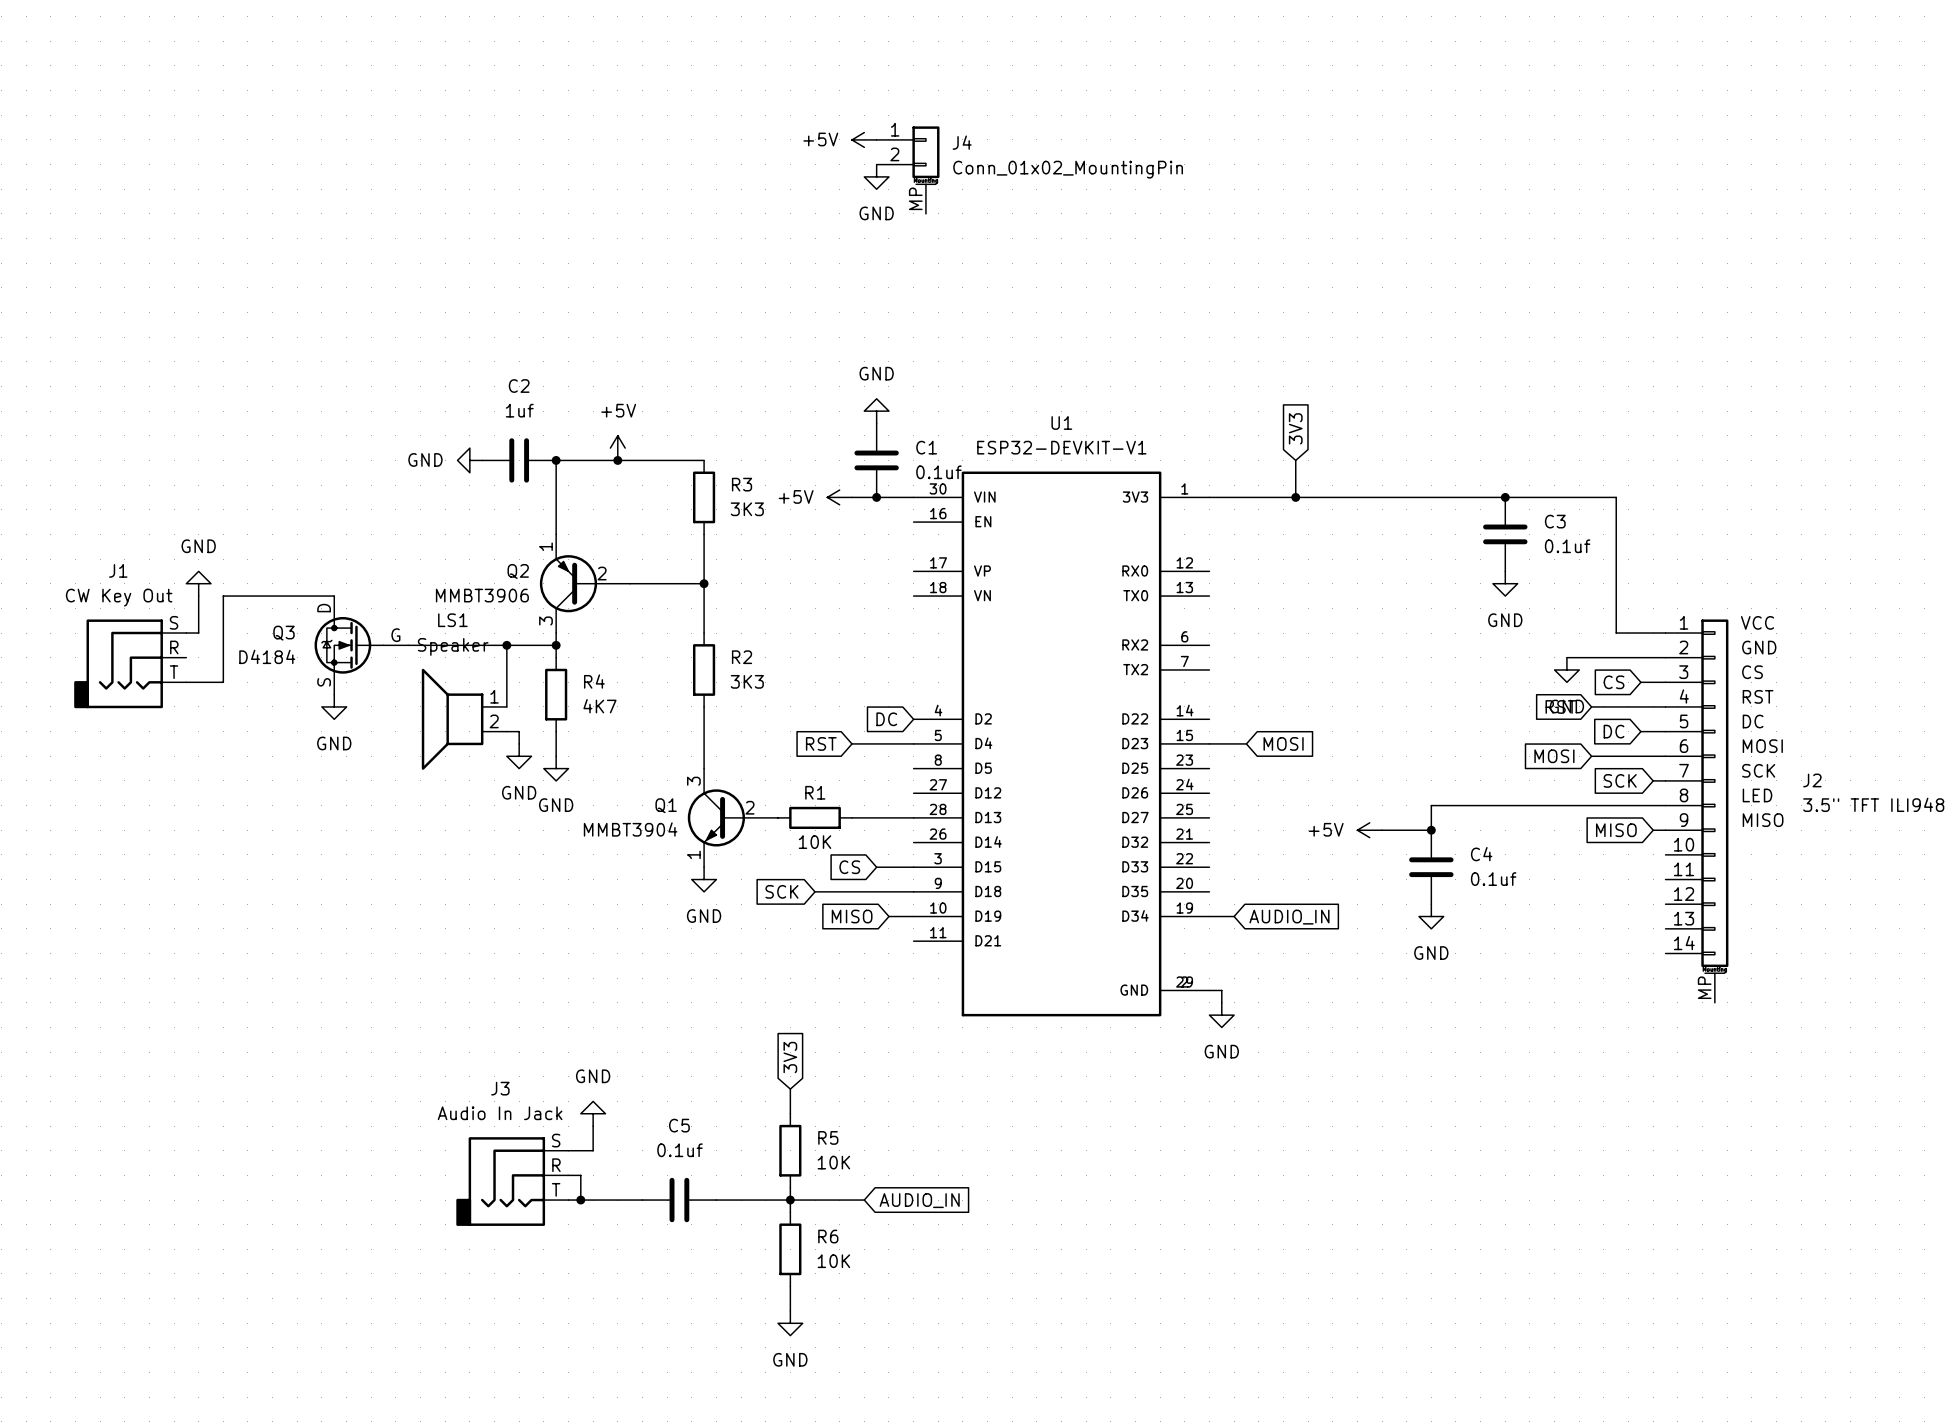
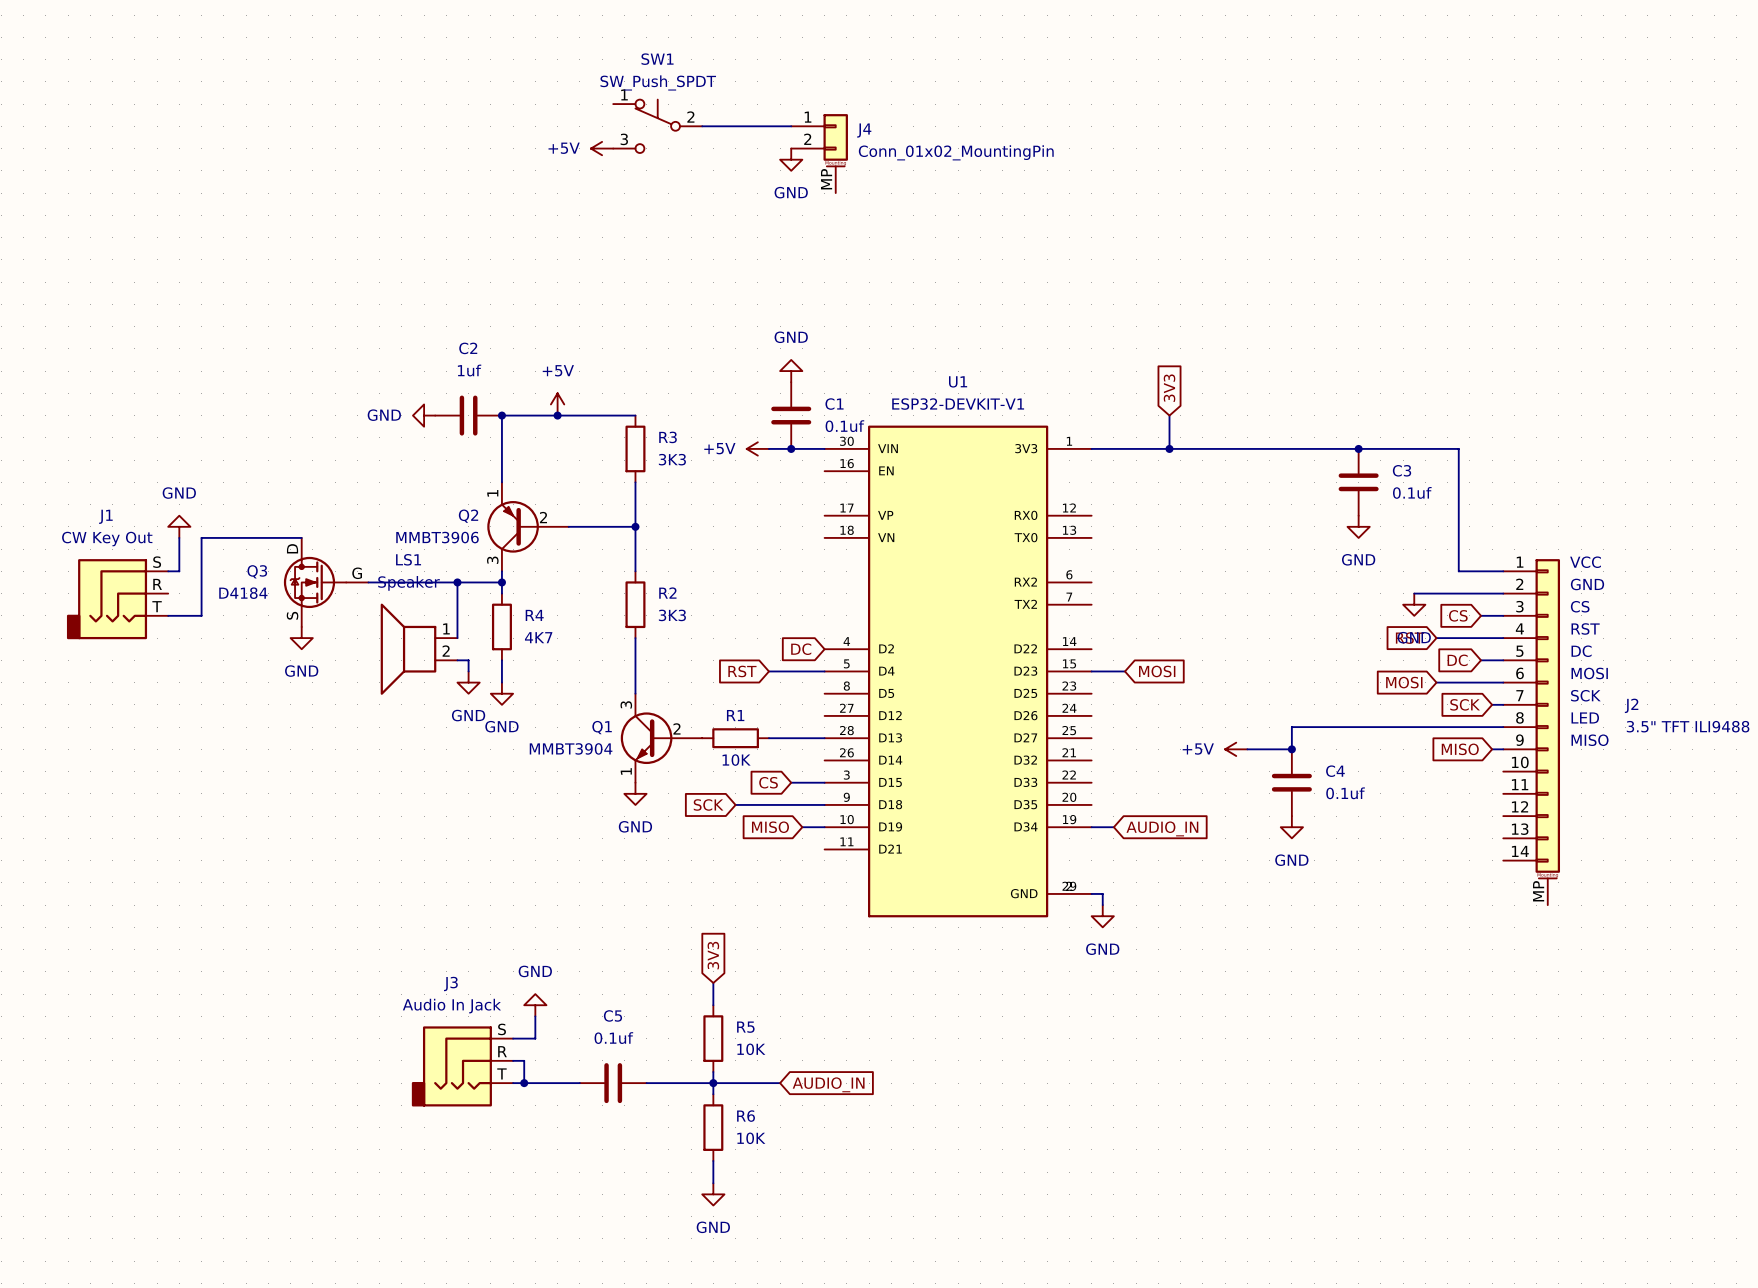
SW1: none -> SW_Push_SPDT (657, 126)
wire: none -> (702, 126) (791, 126)
power symbol position: +5V (864, 139) -> +5V (602, 148)

